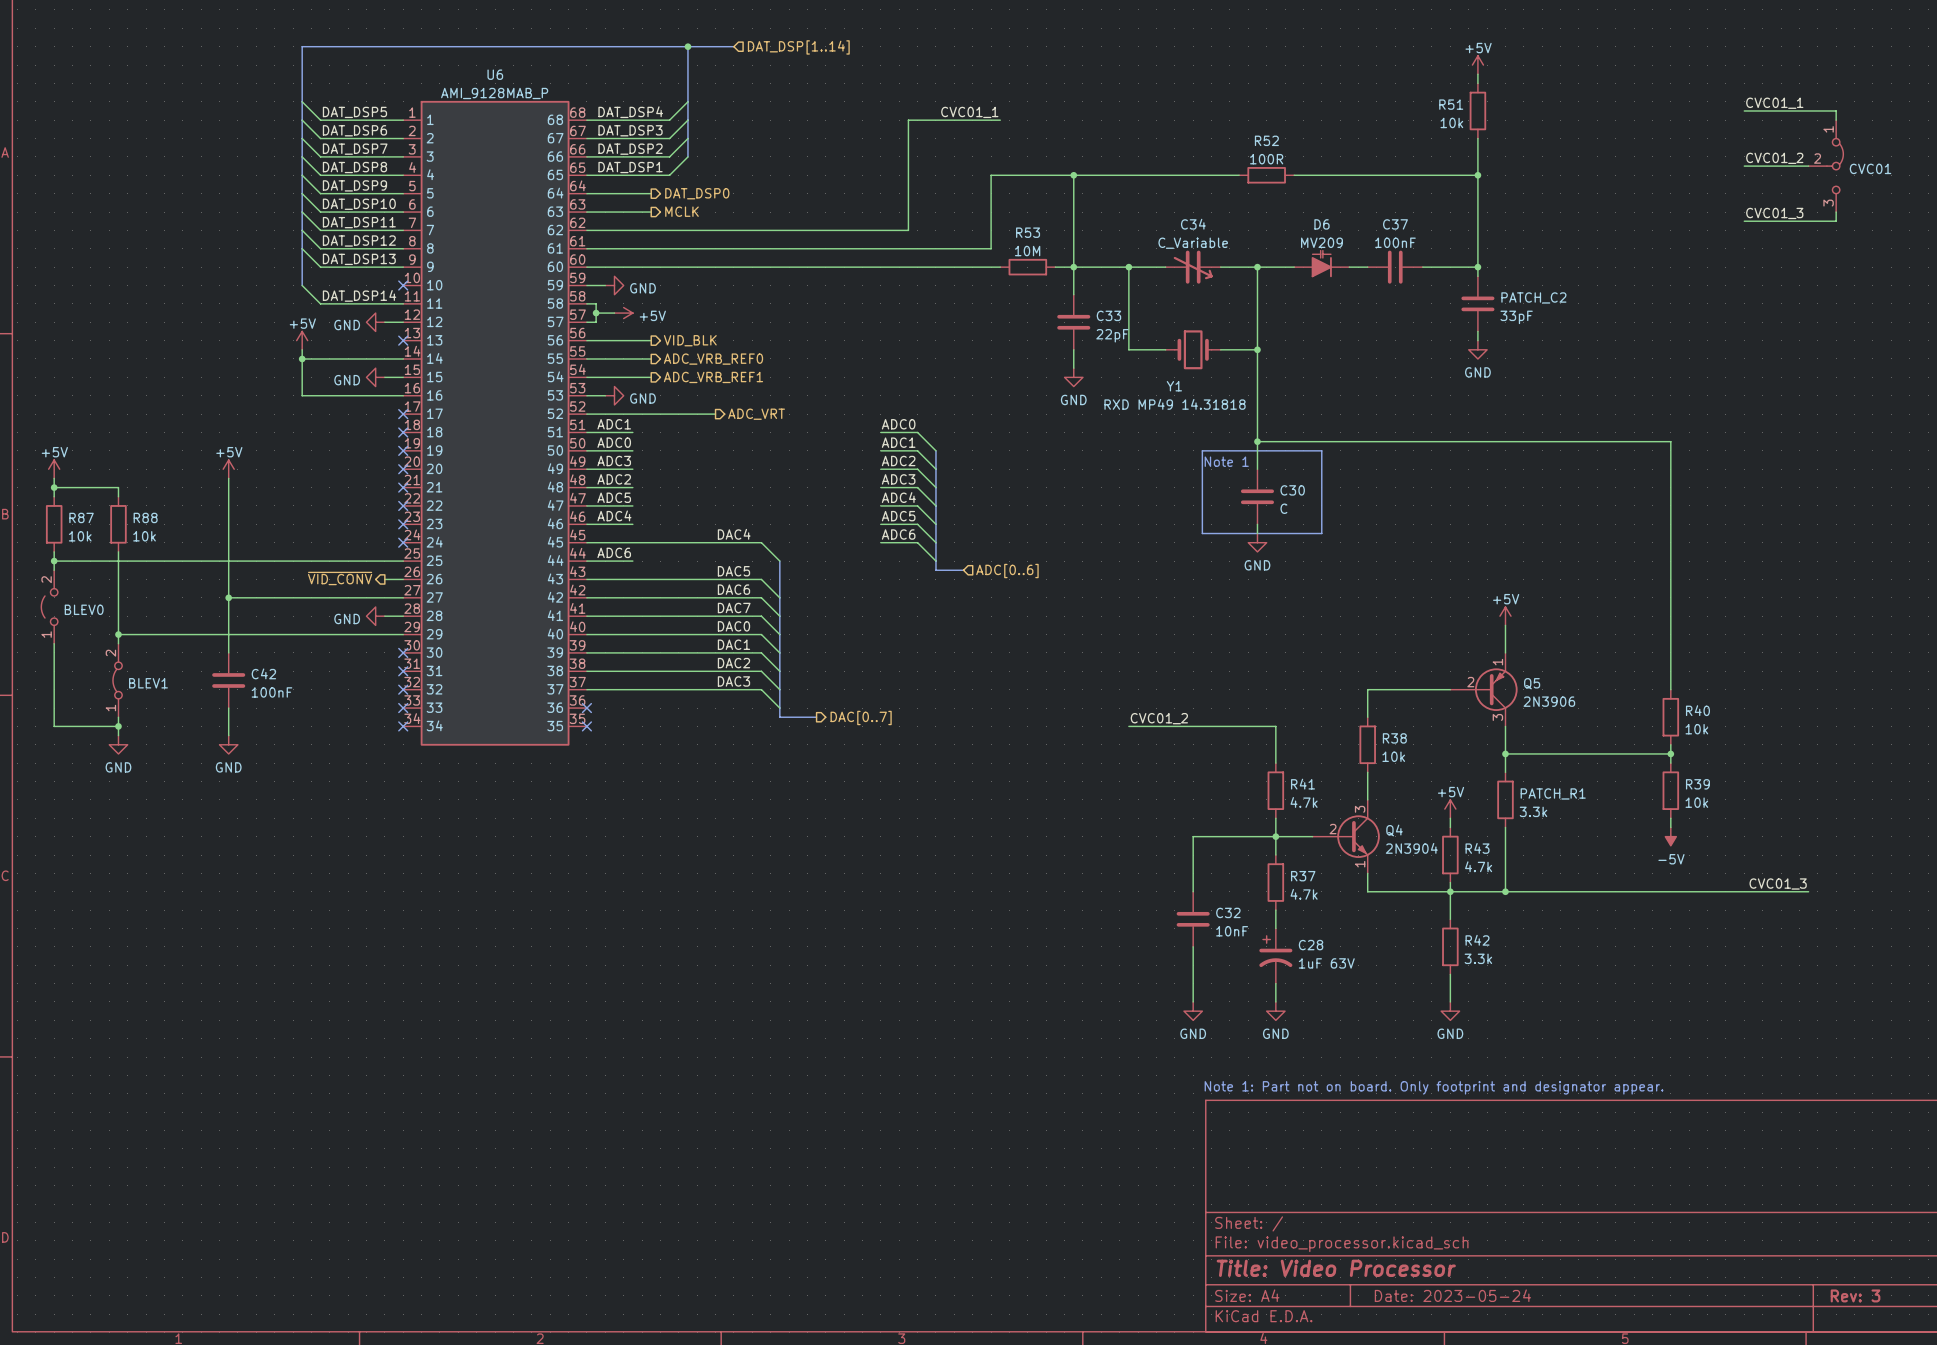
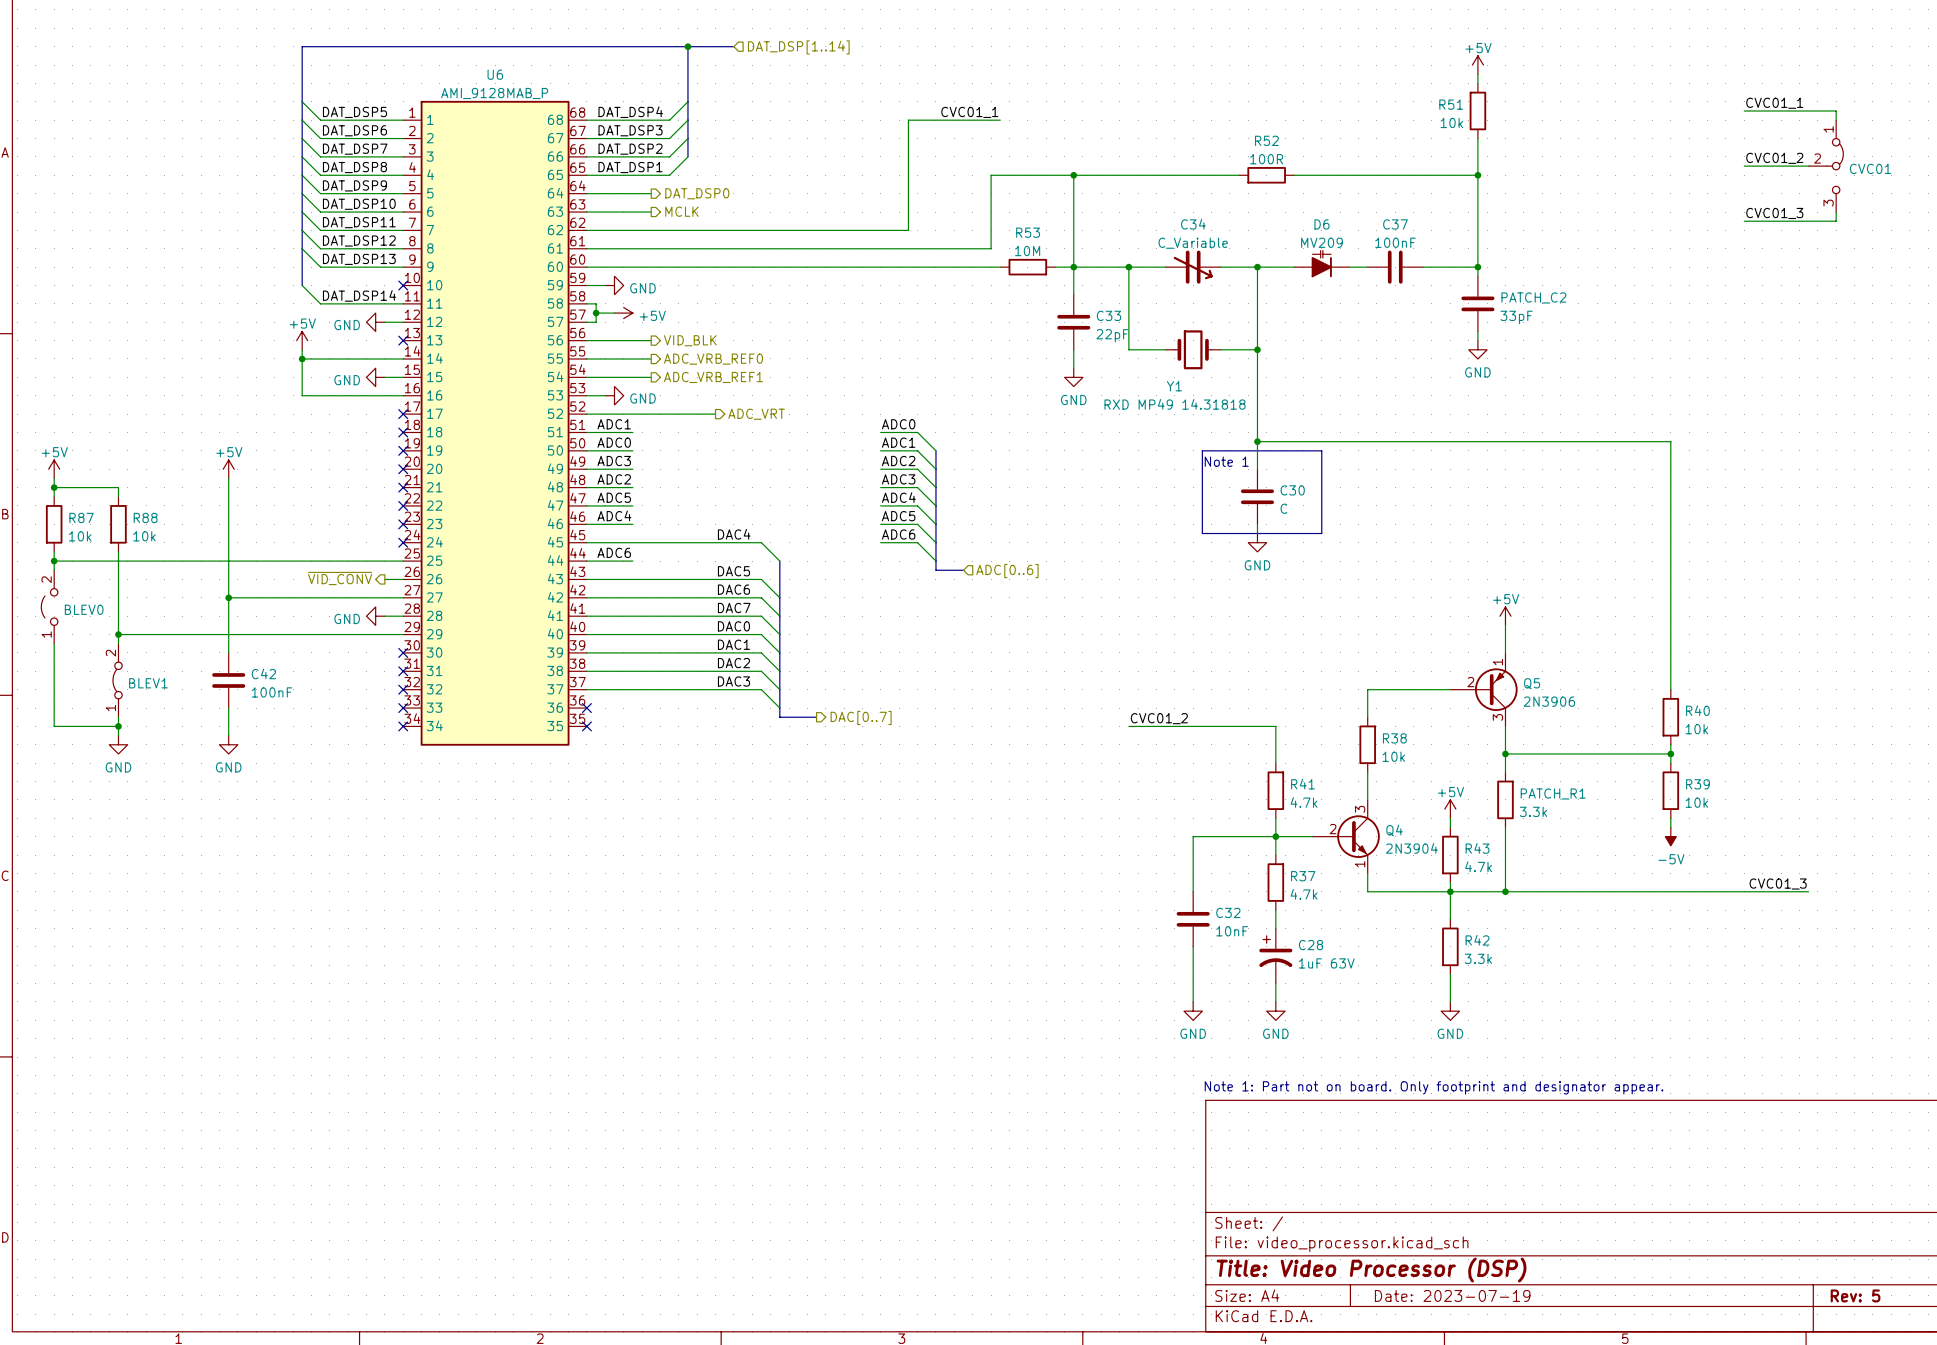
title block: Title: Video Processor (1336, 1268) -> Title: Video Processor (DSP) (1371, 1270)
title block: Date: 2023-05-24 (1452, 1295) -> Date: 2023-07-19 (1452, 1295)
title block: Rev: 3 (1855, 1295) -> Rev: 5 (1855, 1295)

